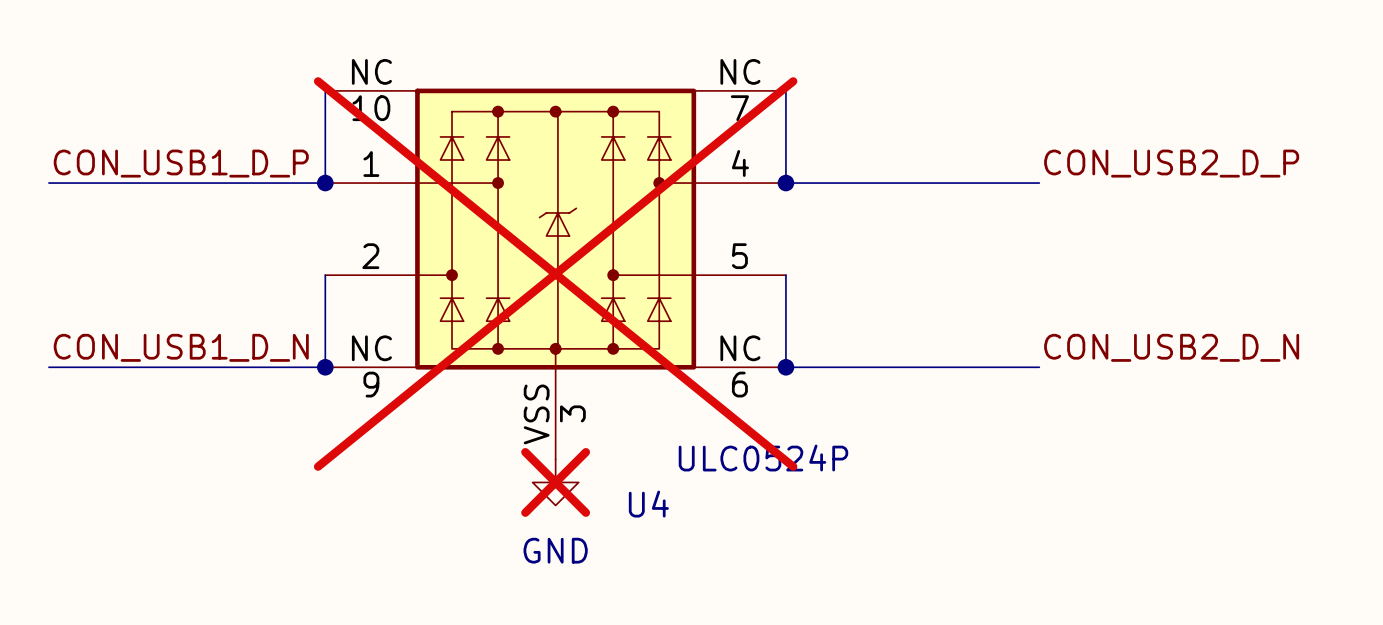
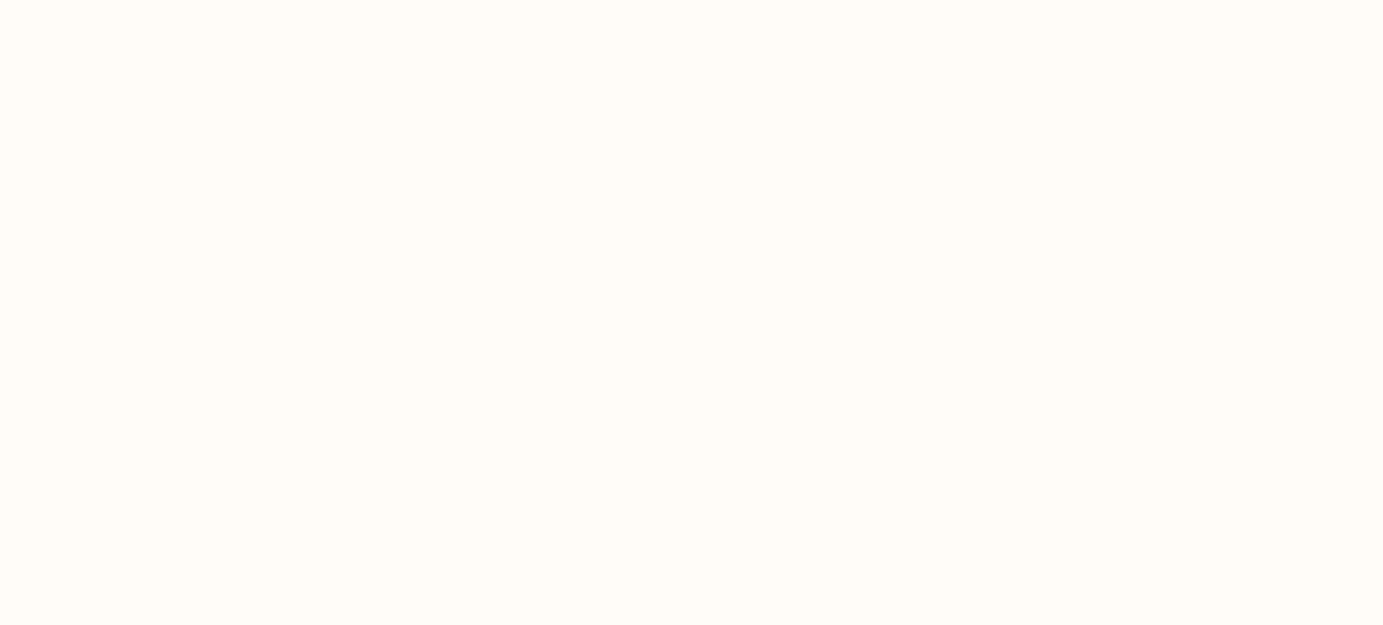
wire: (325, 90) (325, 183) (48, 183) -> none
wire: (785, 90) (785, 183) (1039, 183) -> none
label: CON_USB1_D_P (181, 163) -> none
label: CON_USB2_D_P (1171, 163) -> none
junction: (325, 183) -> none
junction: (785, 183) -> none
U4: ULC0524P (555, 274) -> none
wire: (325, 275) (325, 367) (48, 367) -> none
wire: (785, 275) (785, 367) (1039, 367) -> none
label: CON_USB1_D_N (181, 347) -> none
label: CON_USB2_D_N (1171, 347) -> none
junction: (325, 367) -> none
junction: (785, 367) -> none
power symbol: GND (555, 482) -> none

